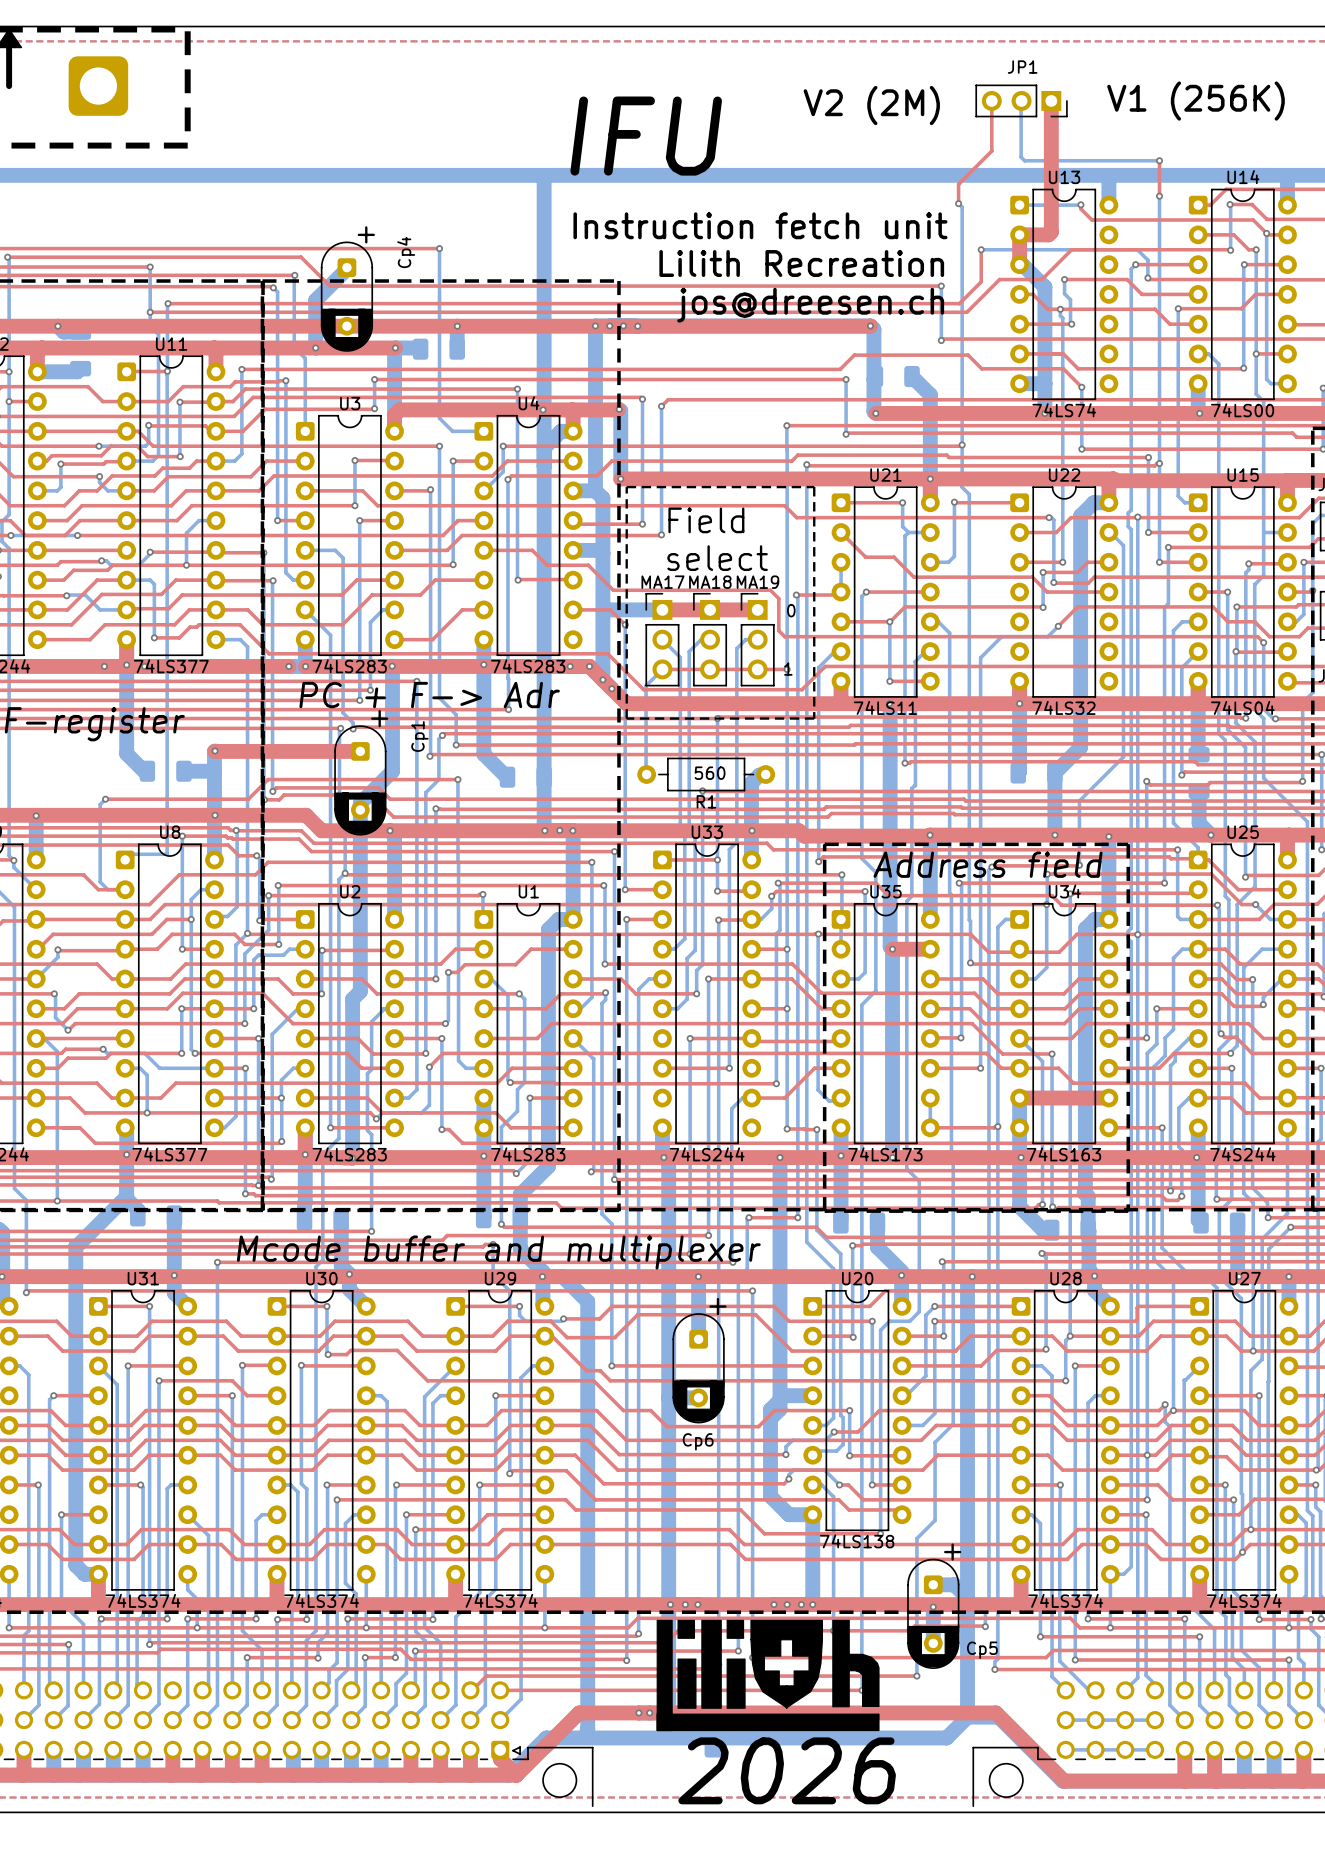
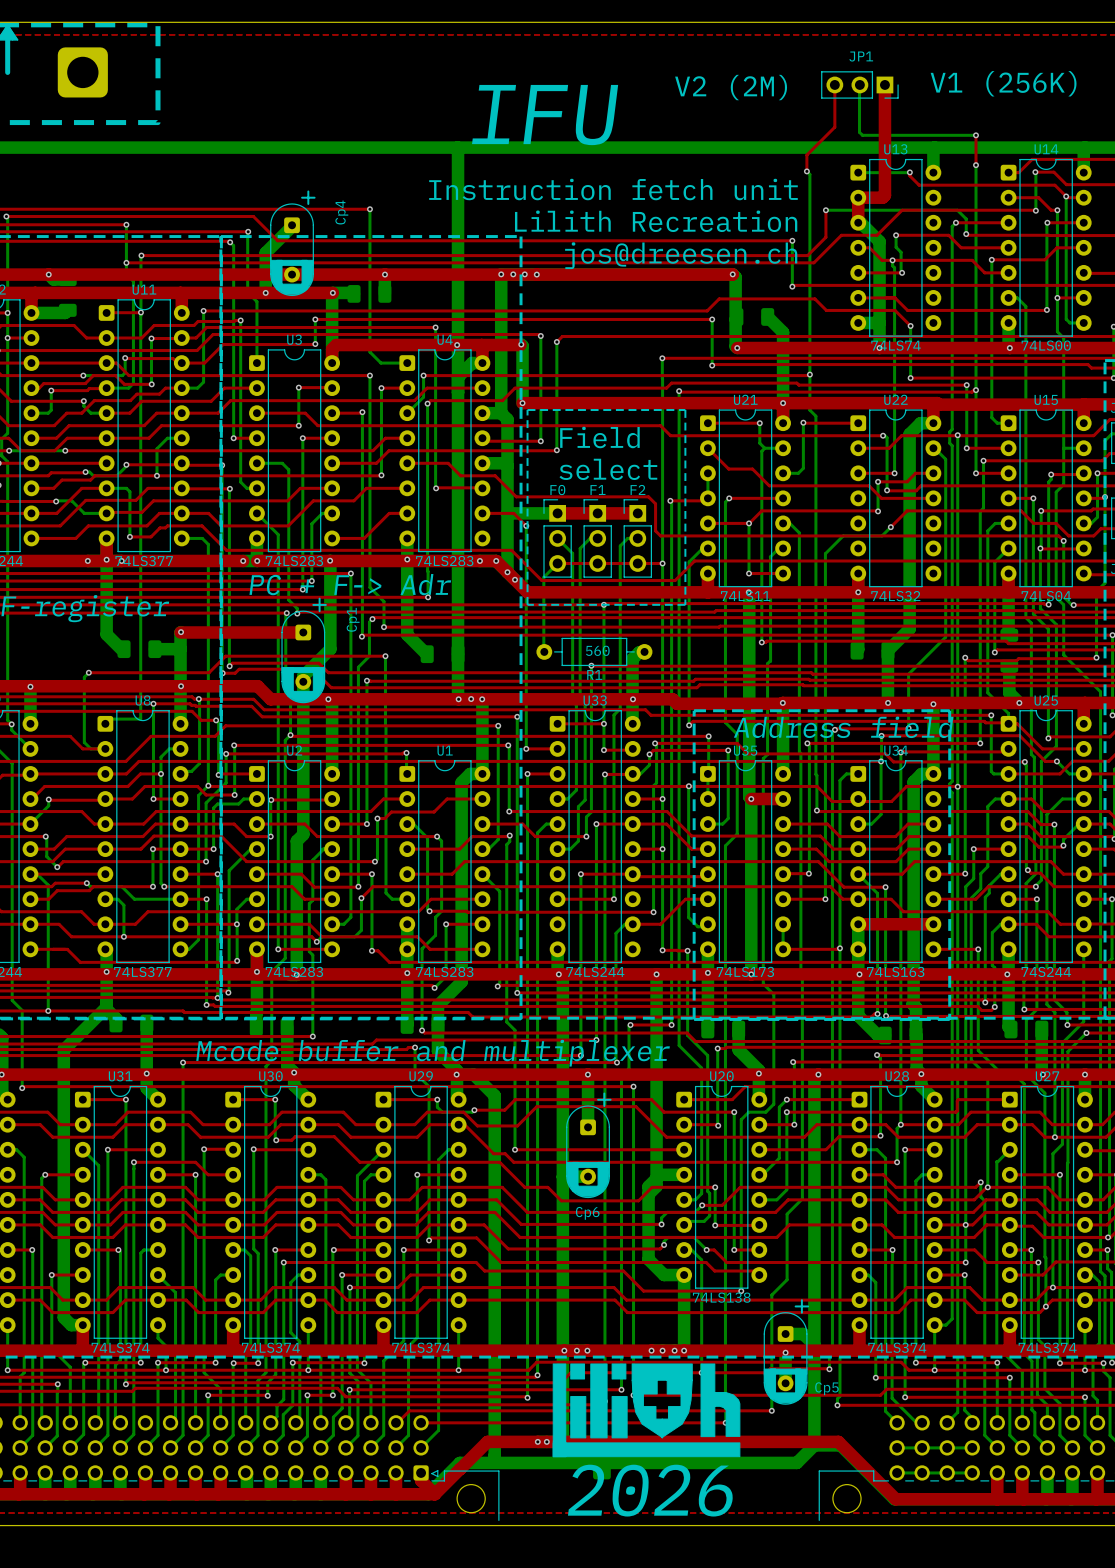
MA17 name: MA17 (663, 582) -> F0 (557, 490)
MA18 name: MA18 (710, 582) -> F1 (597, 490)
MA19 name: MA19 (757, 582) -> F2 (637, 489)
text: 0 (791, 610) -> none
text: 1 (788, 669) -> none

